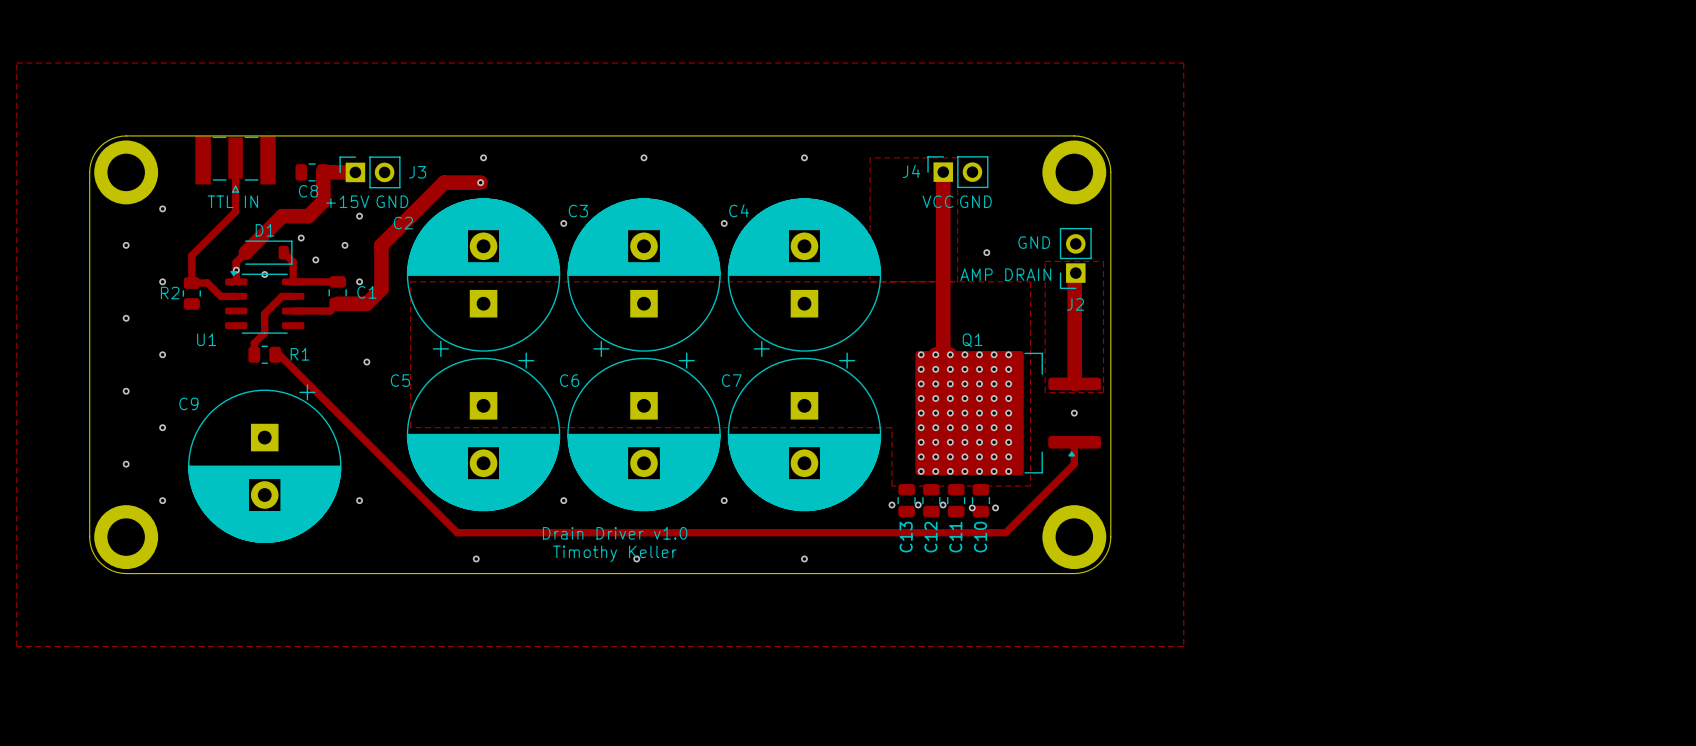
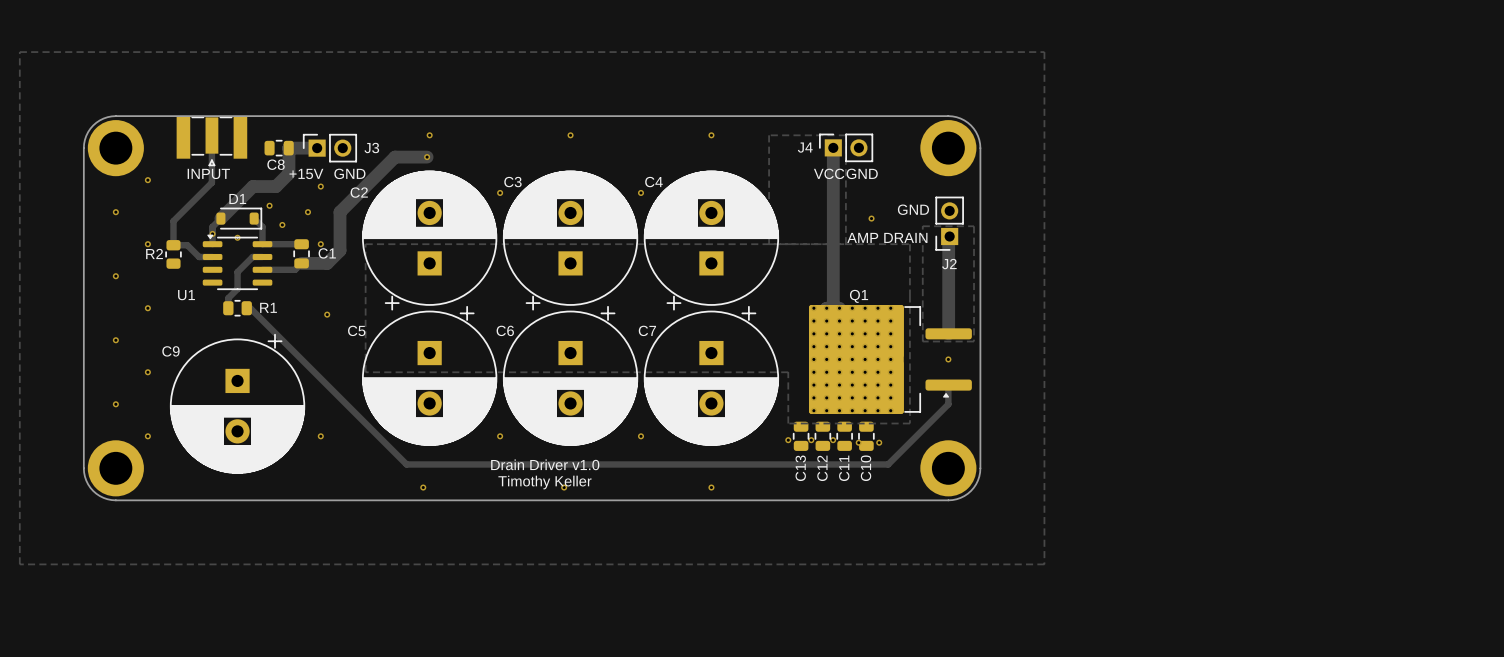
text: TTL IN (232, 201) -> INPUT (208, 173)

